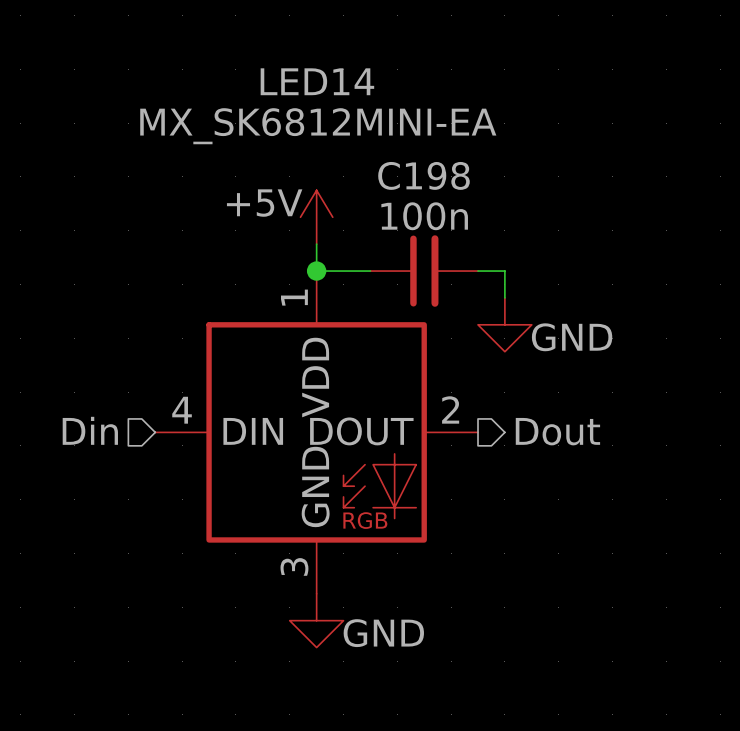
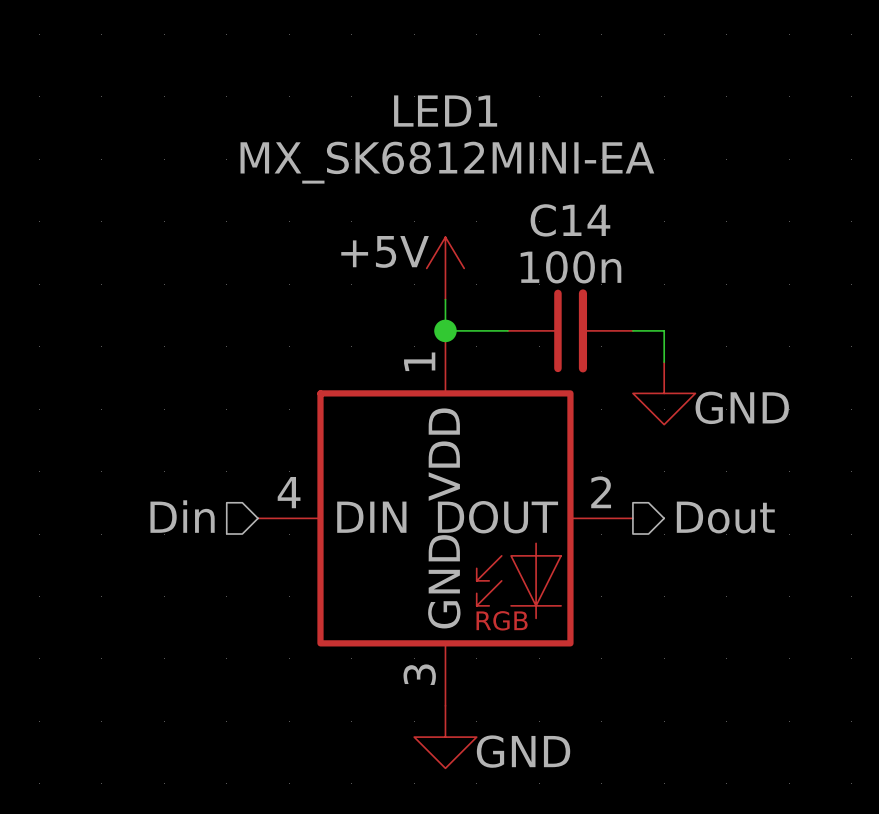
LED14 name: LED14 (317, 81) -> LED1 (445, 111)
C198 name: C198 (423, 175) -> C14 (570, 220)

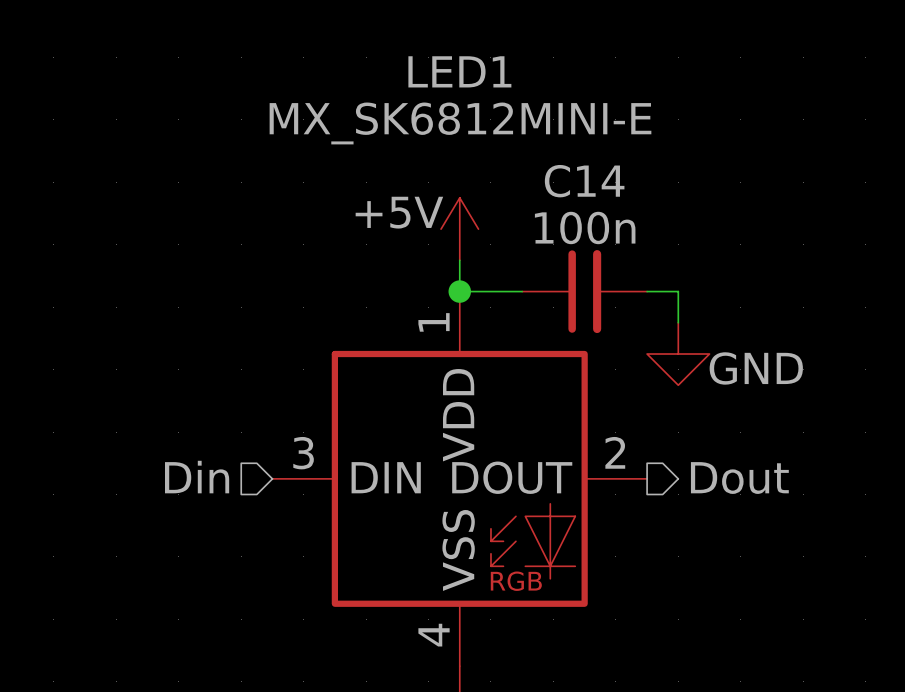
LED1 value: MX_SK6812MINI-EA (447, 162) -> MX_SK6812MINI-E (460, 123)
LED1 pin number: 4 (289, 492) -> 3 (303, 453)
LED1 pin name: GND (444, 581) -> VSS (458, 550)
LED1 pin number: 3 (419, 674) -> 4 (434, 635)

